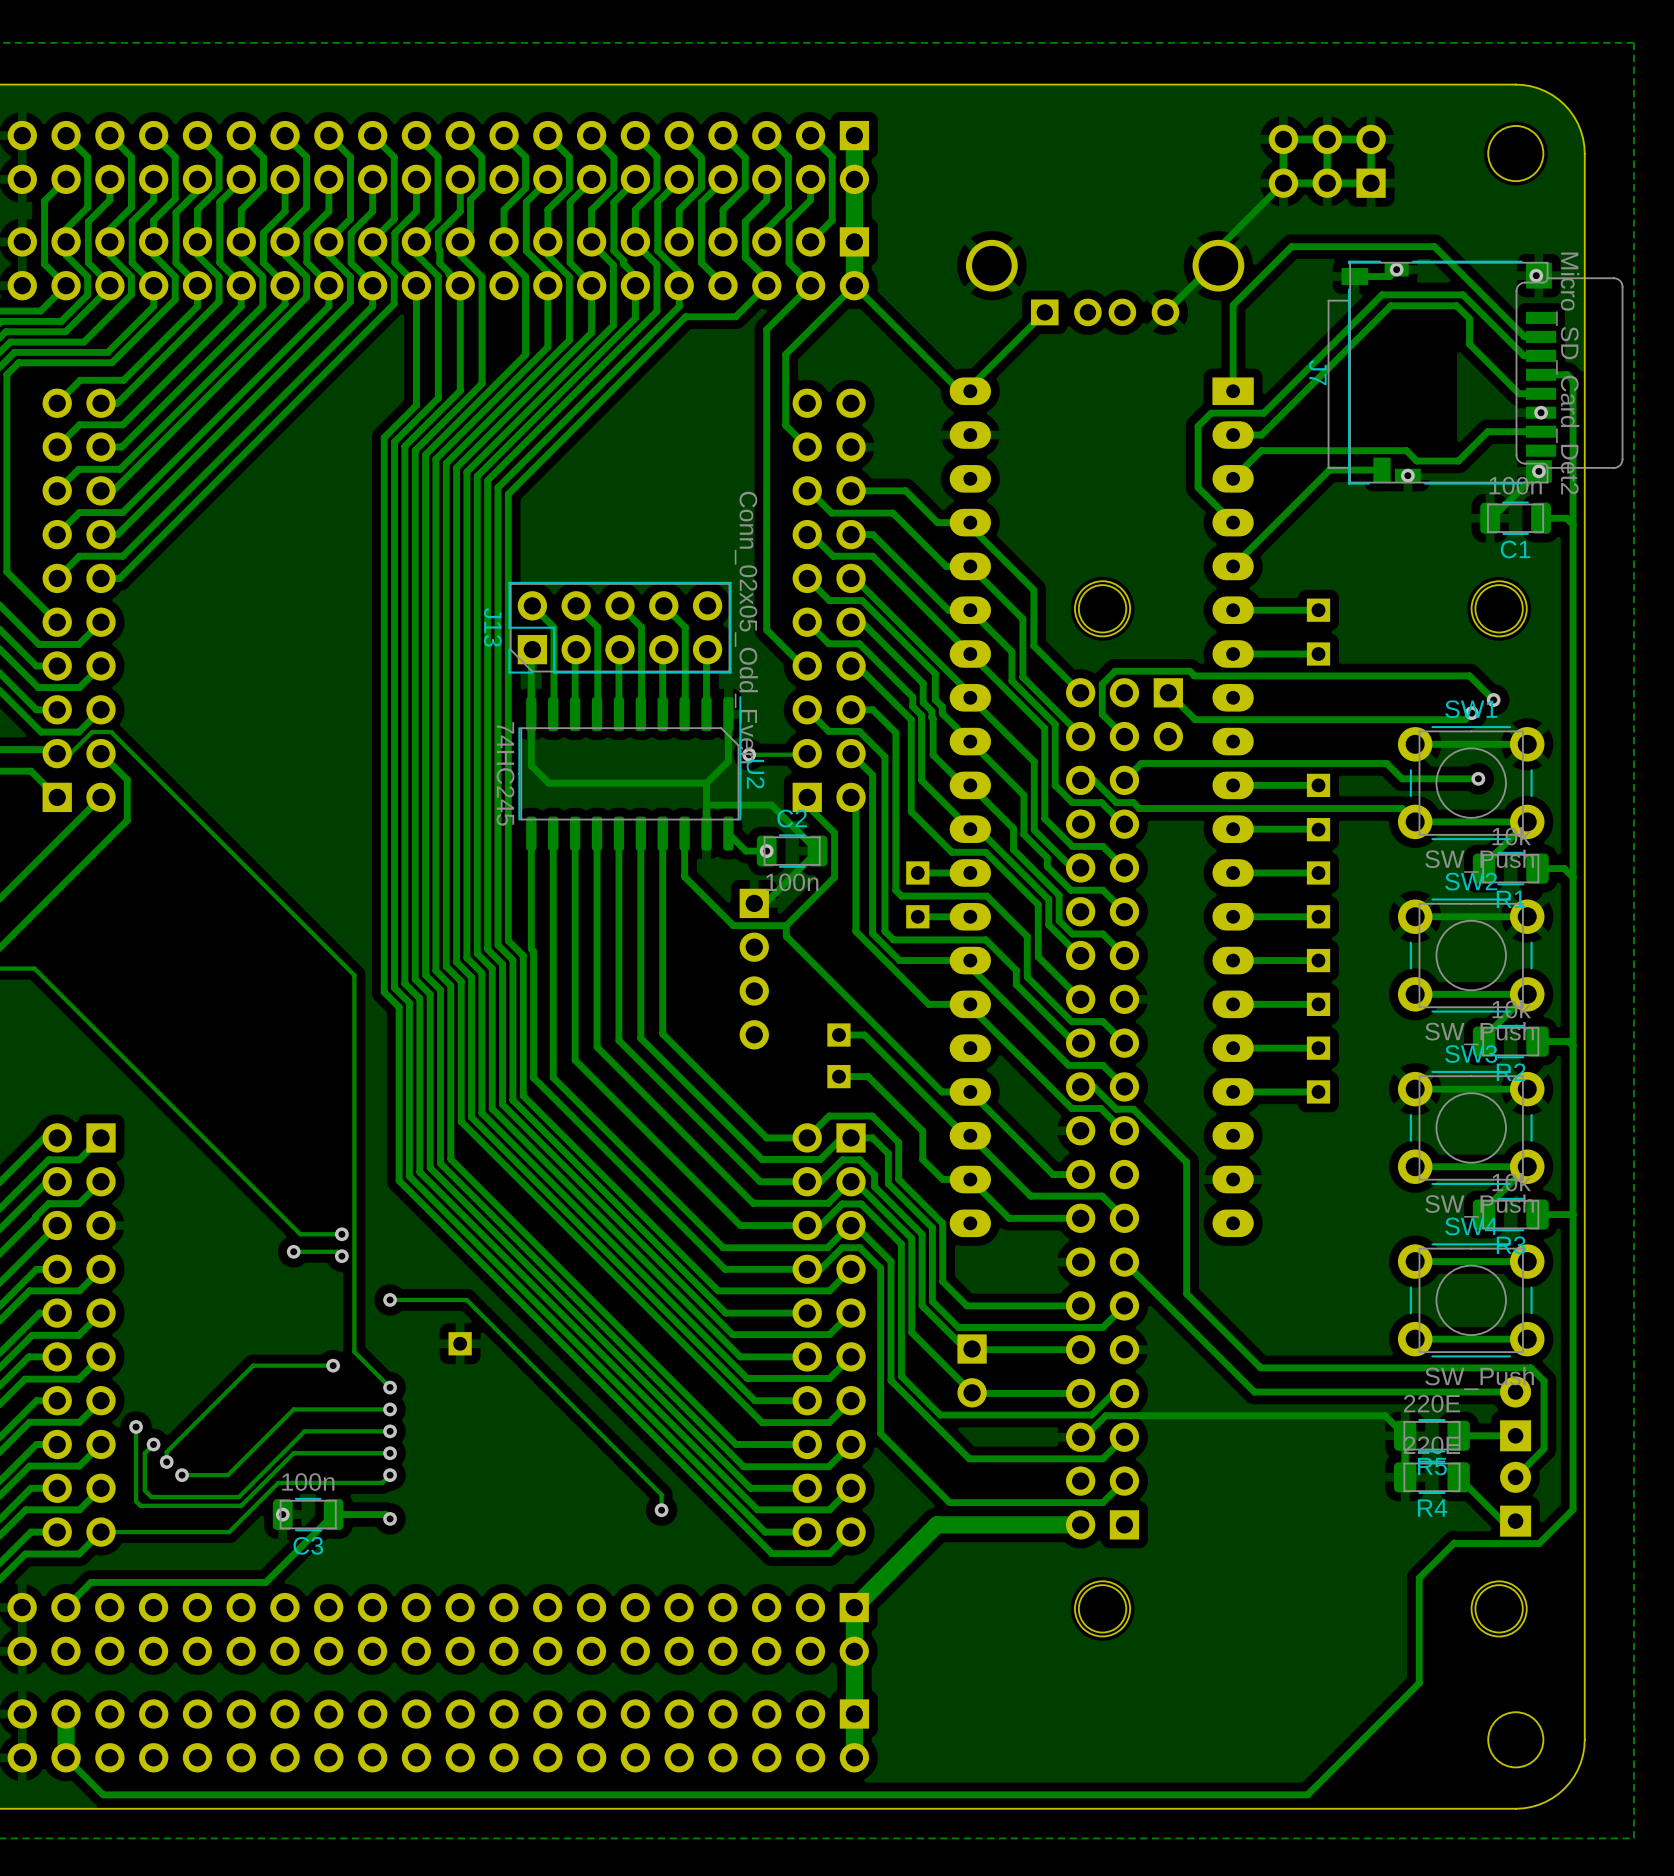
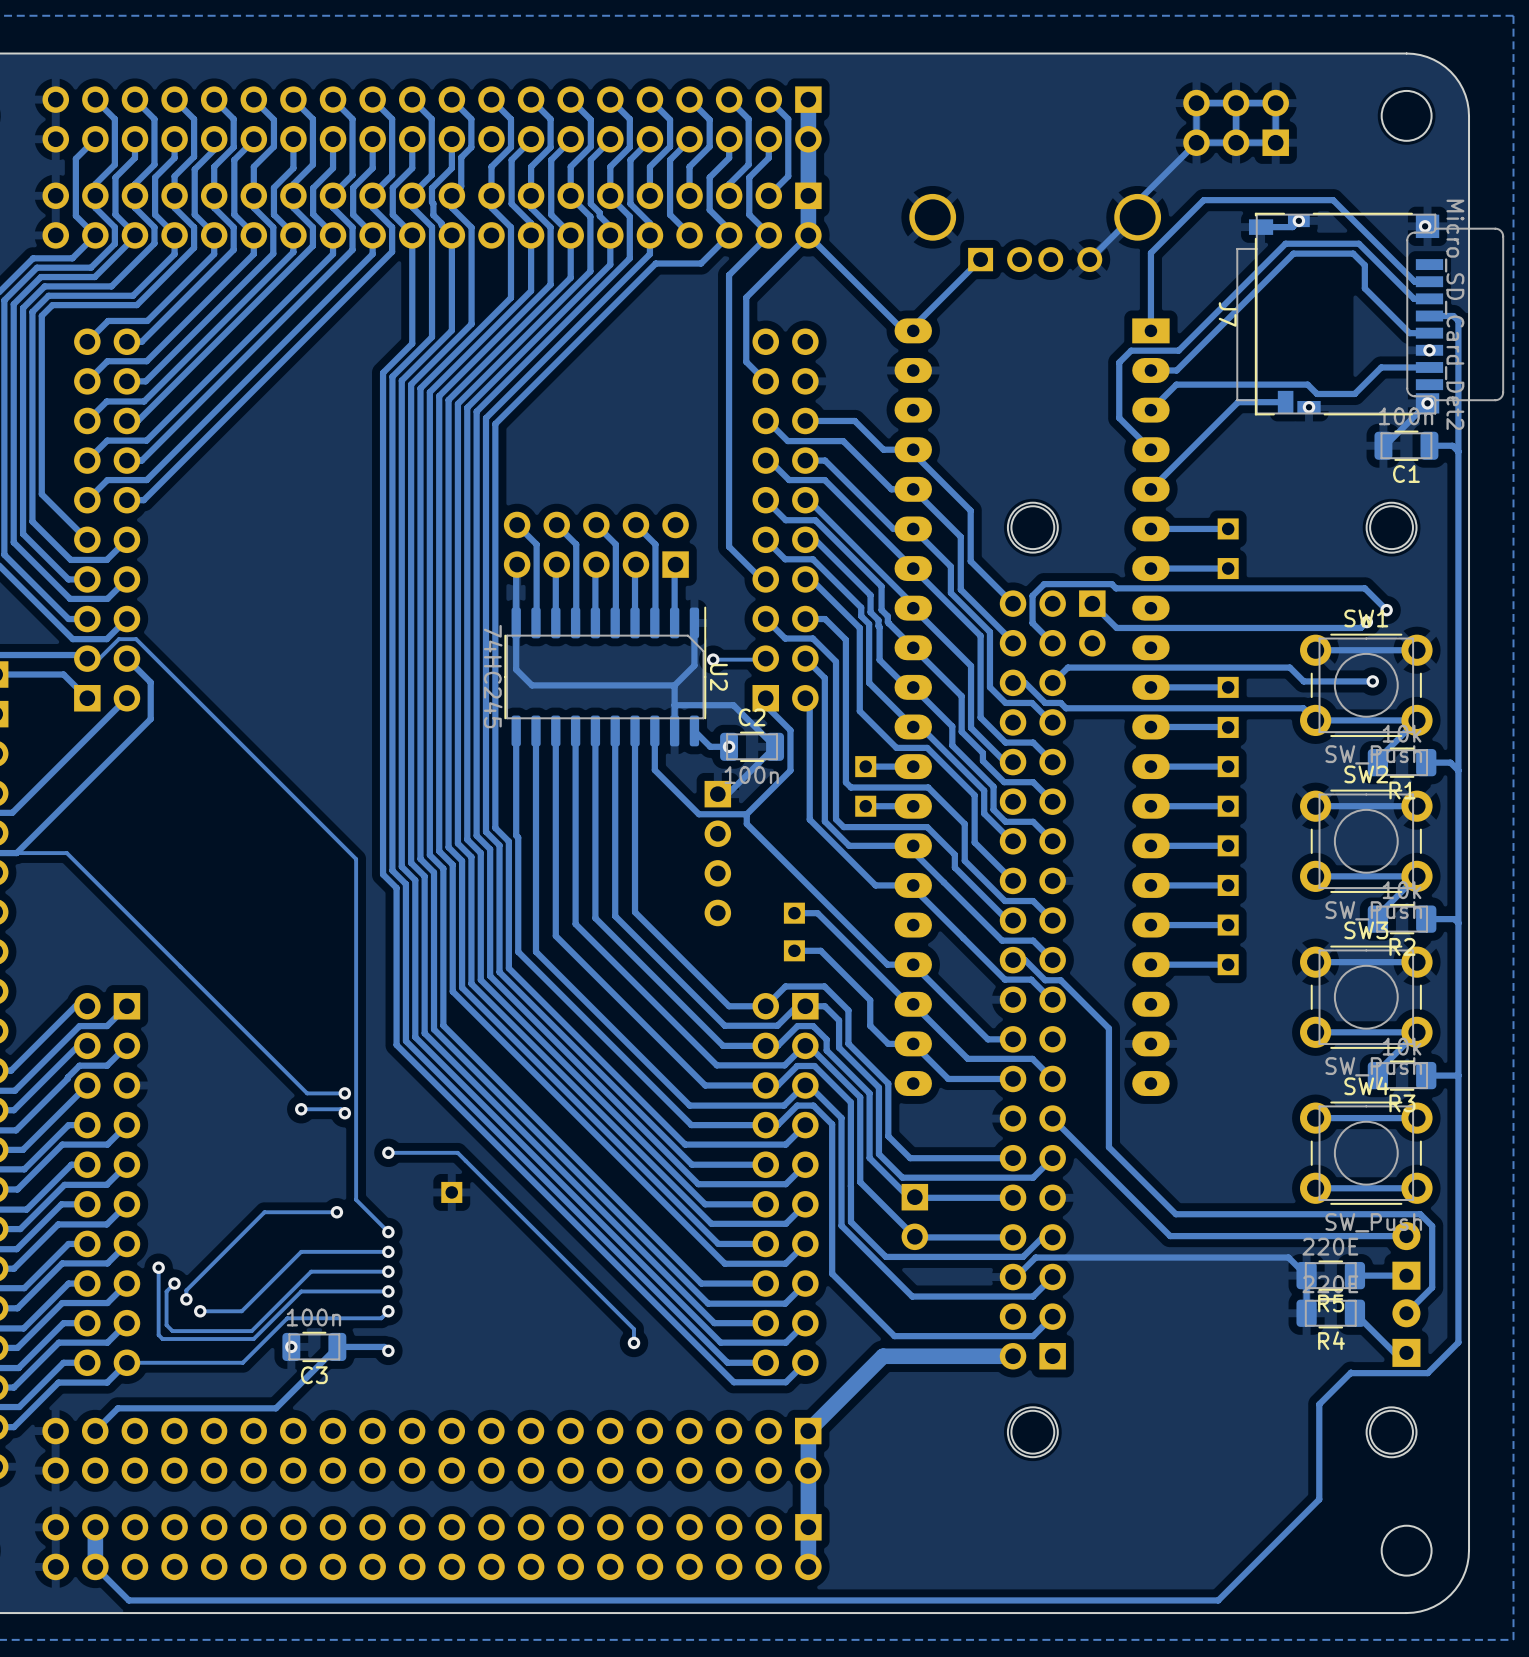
J13 side: bottom (619, 627) -> top (596, 544)

